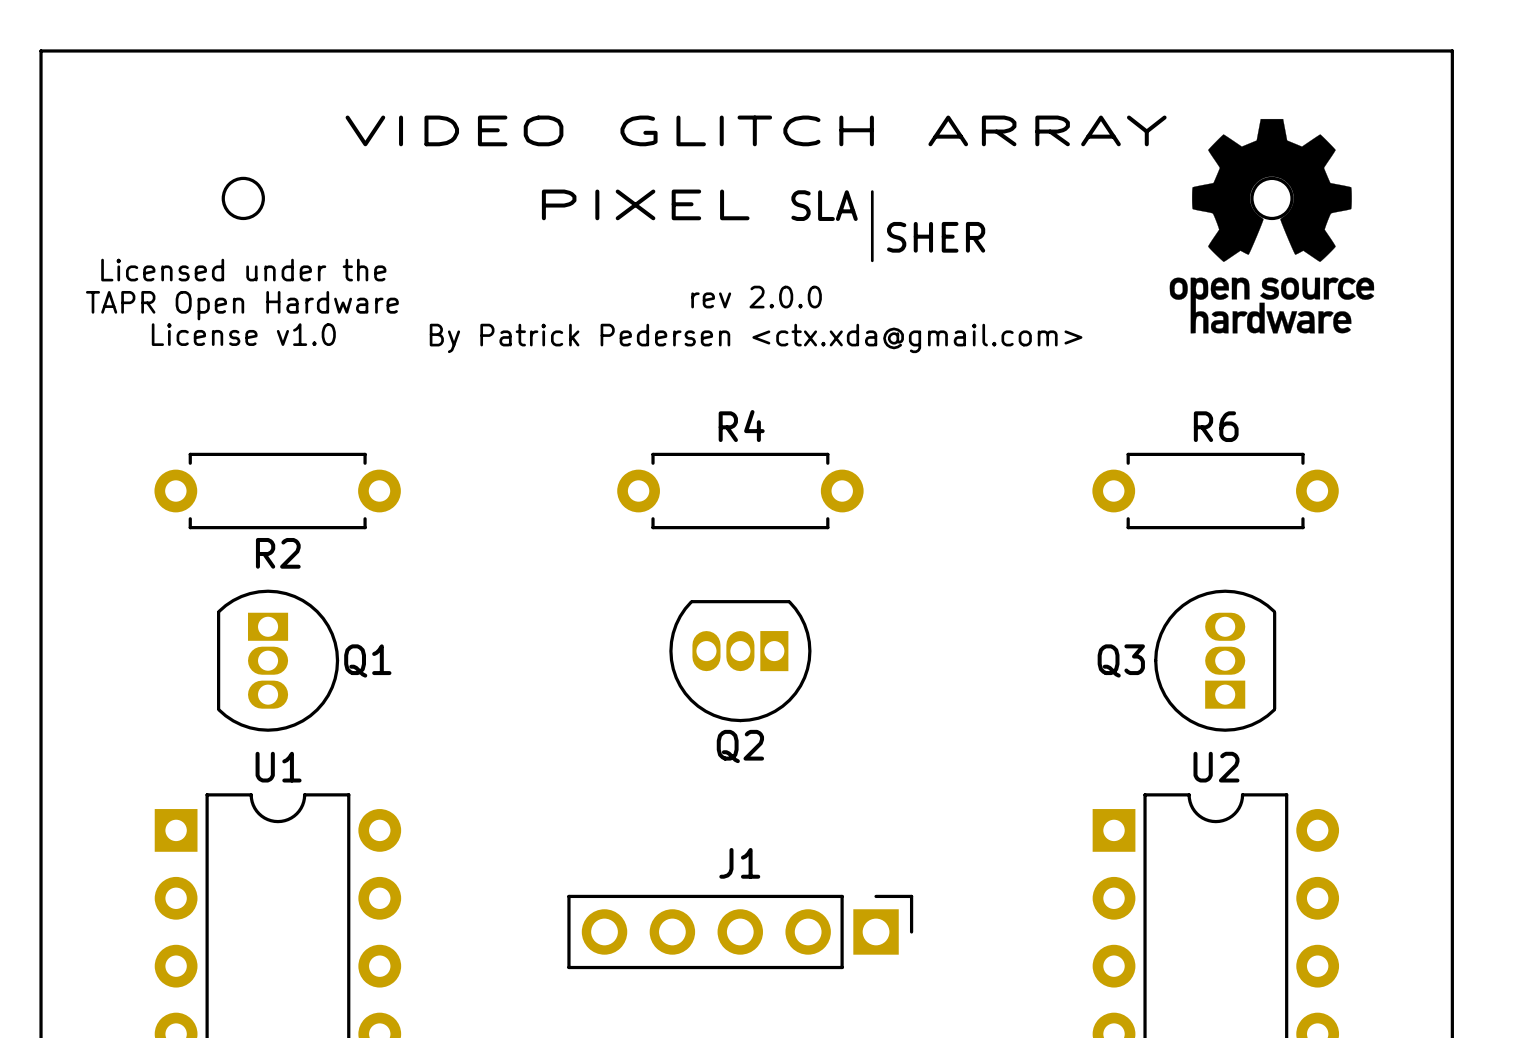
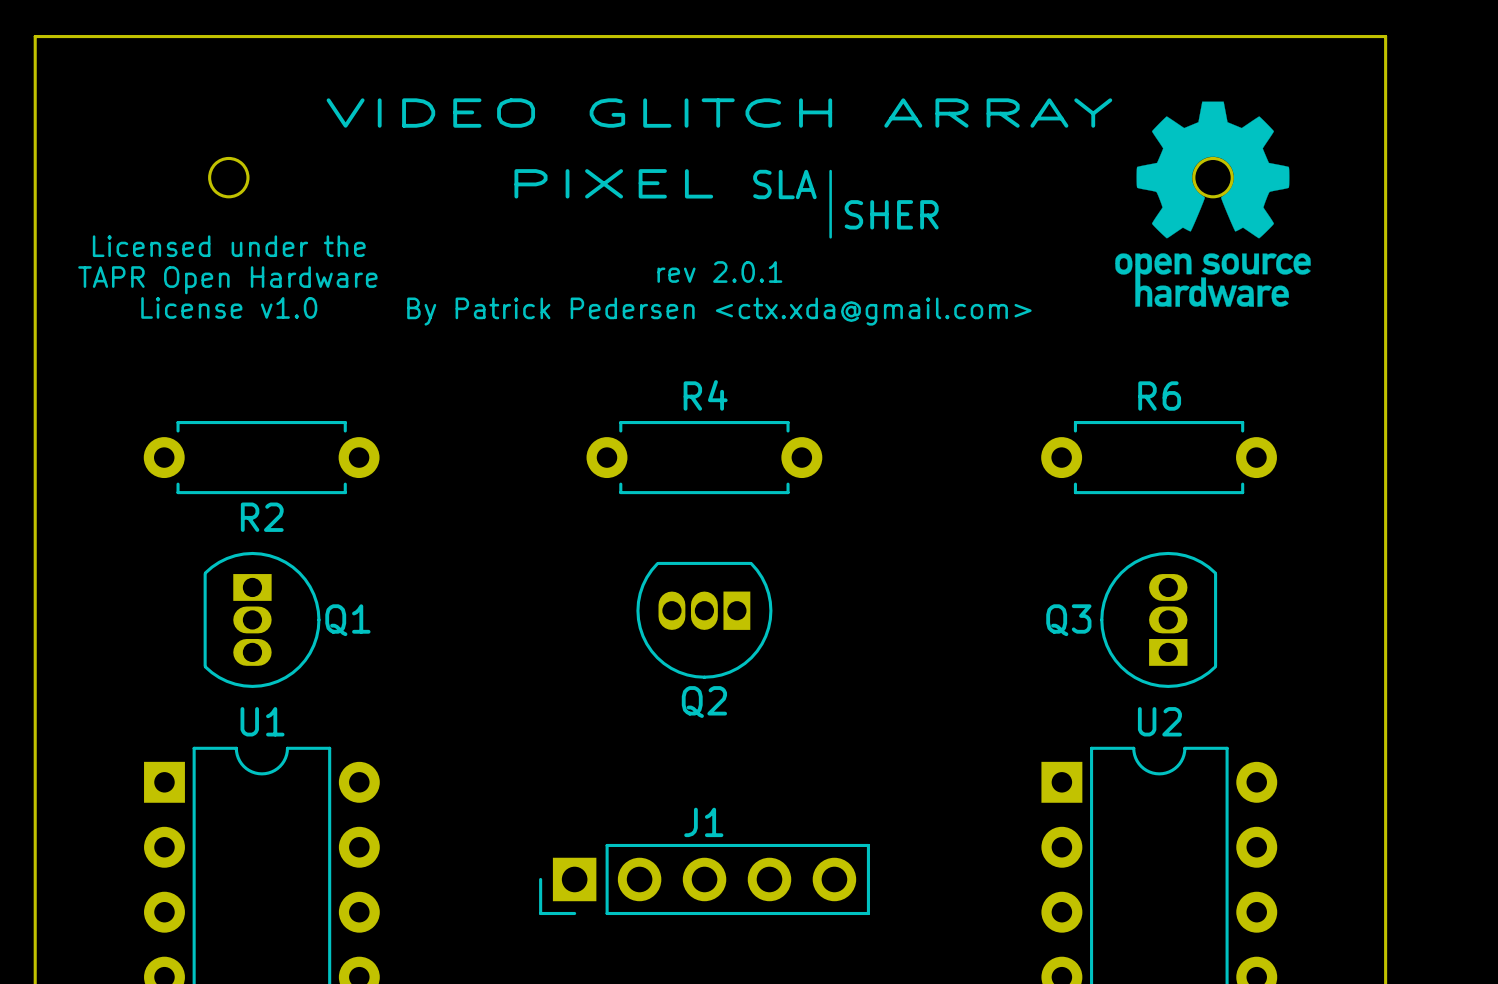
text: rev 2.0.0 (756, 297) -> rev 2.0.1 (719, 272)
J1 rotation: 0° (740, 931) -> 180° (704, 879)

